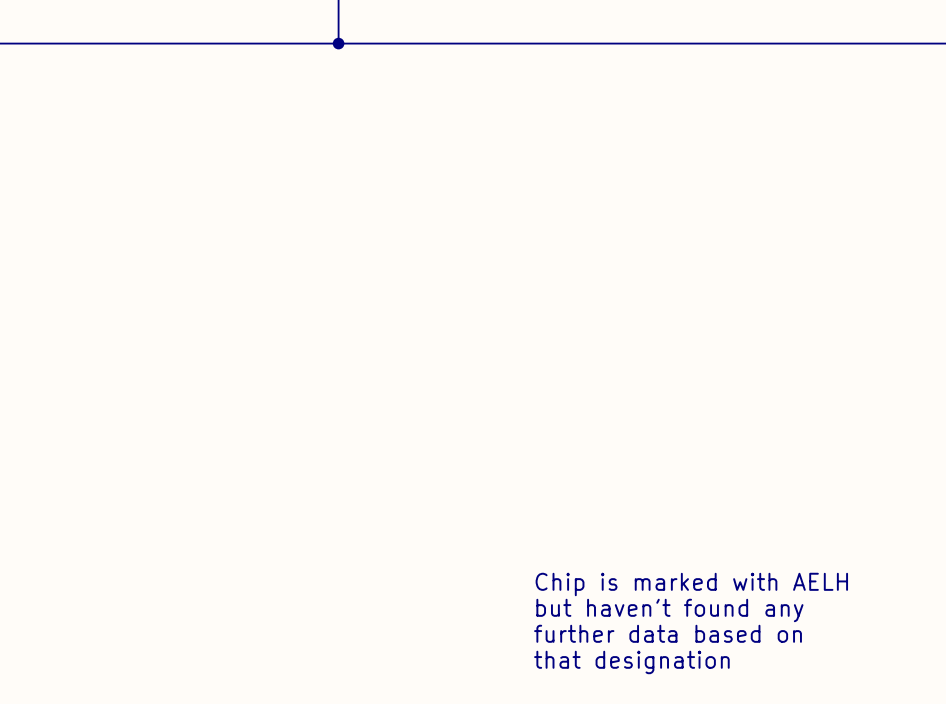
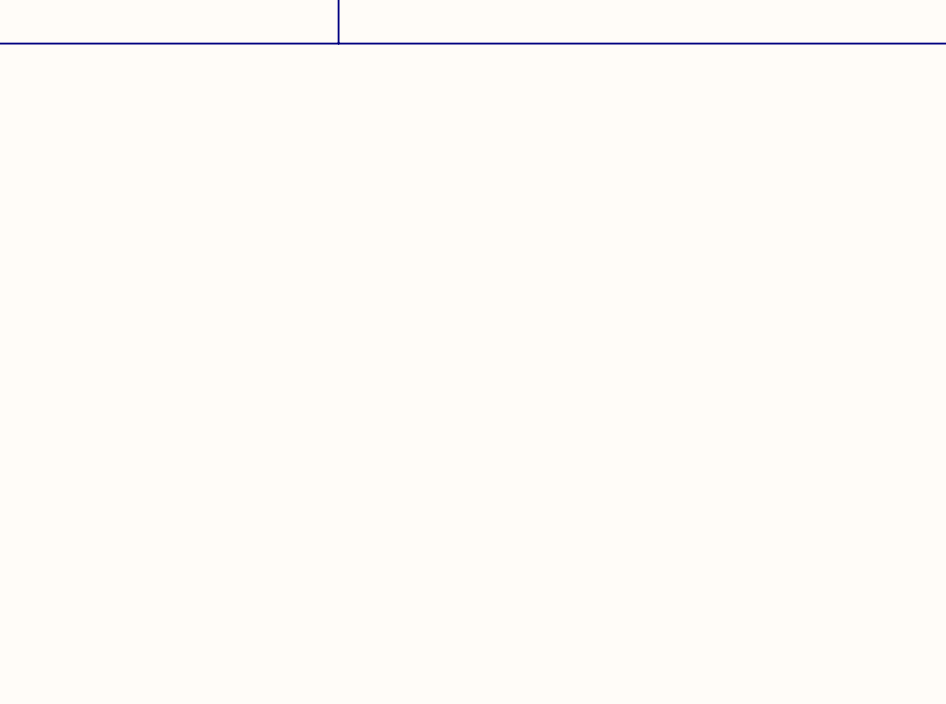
junction: (338, 43) -> none
text: Chip is marked with AELH (691, 584) -> none
text: but haven't found any (669, 610) -> none
text: further data based on (668, 633) -> none
text: that designation (631, 662) -> none

